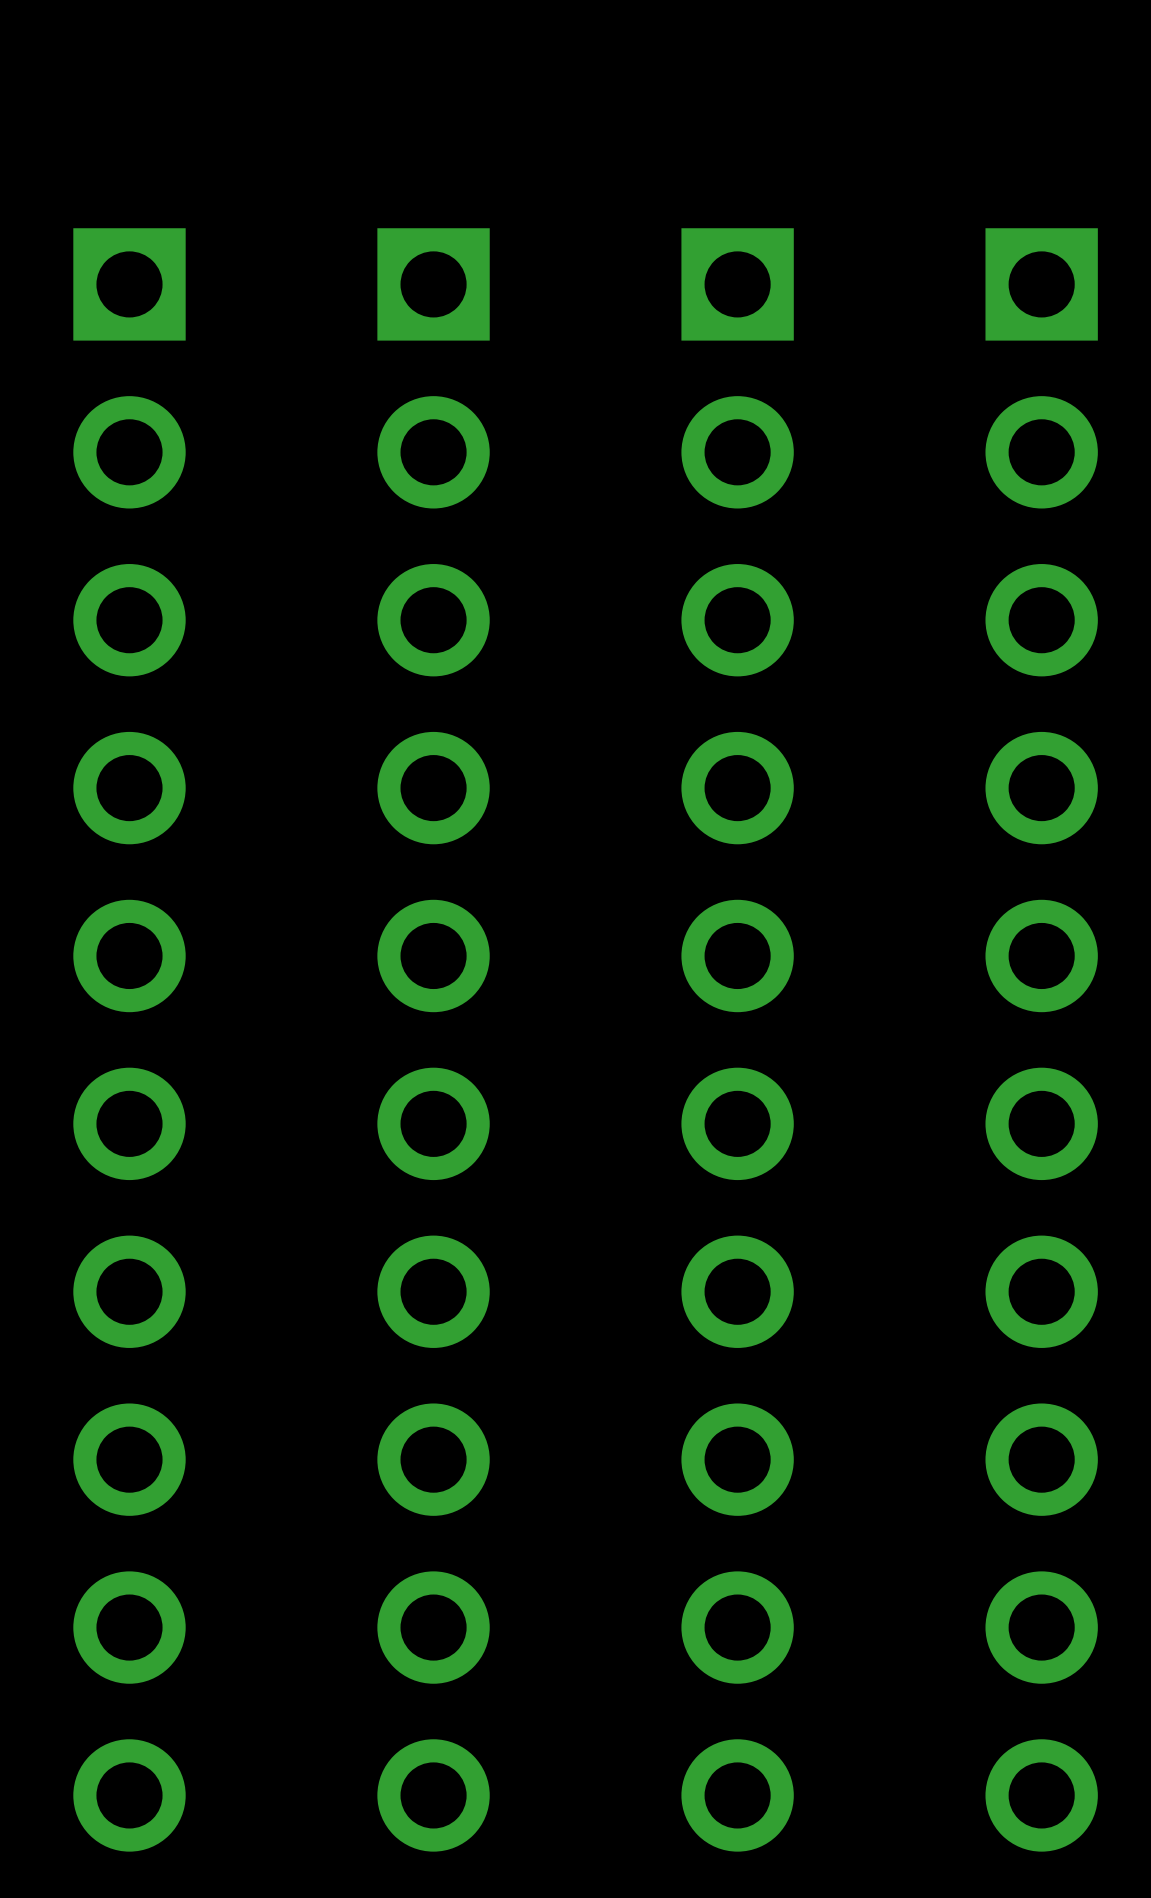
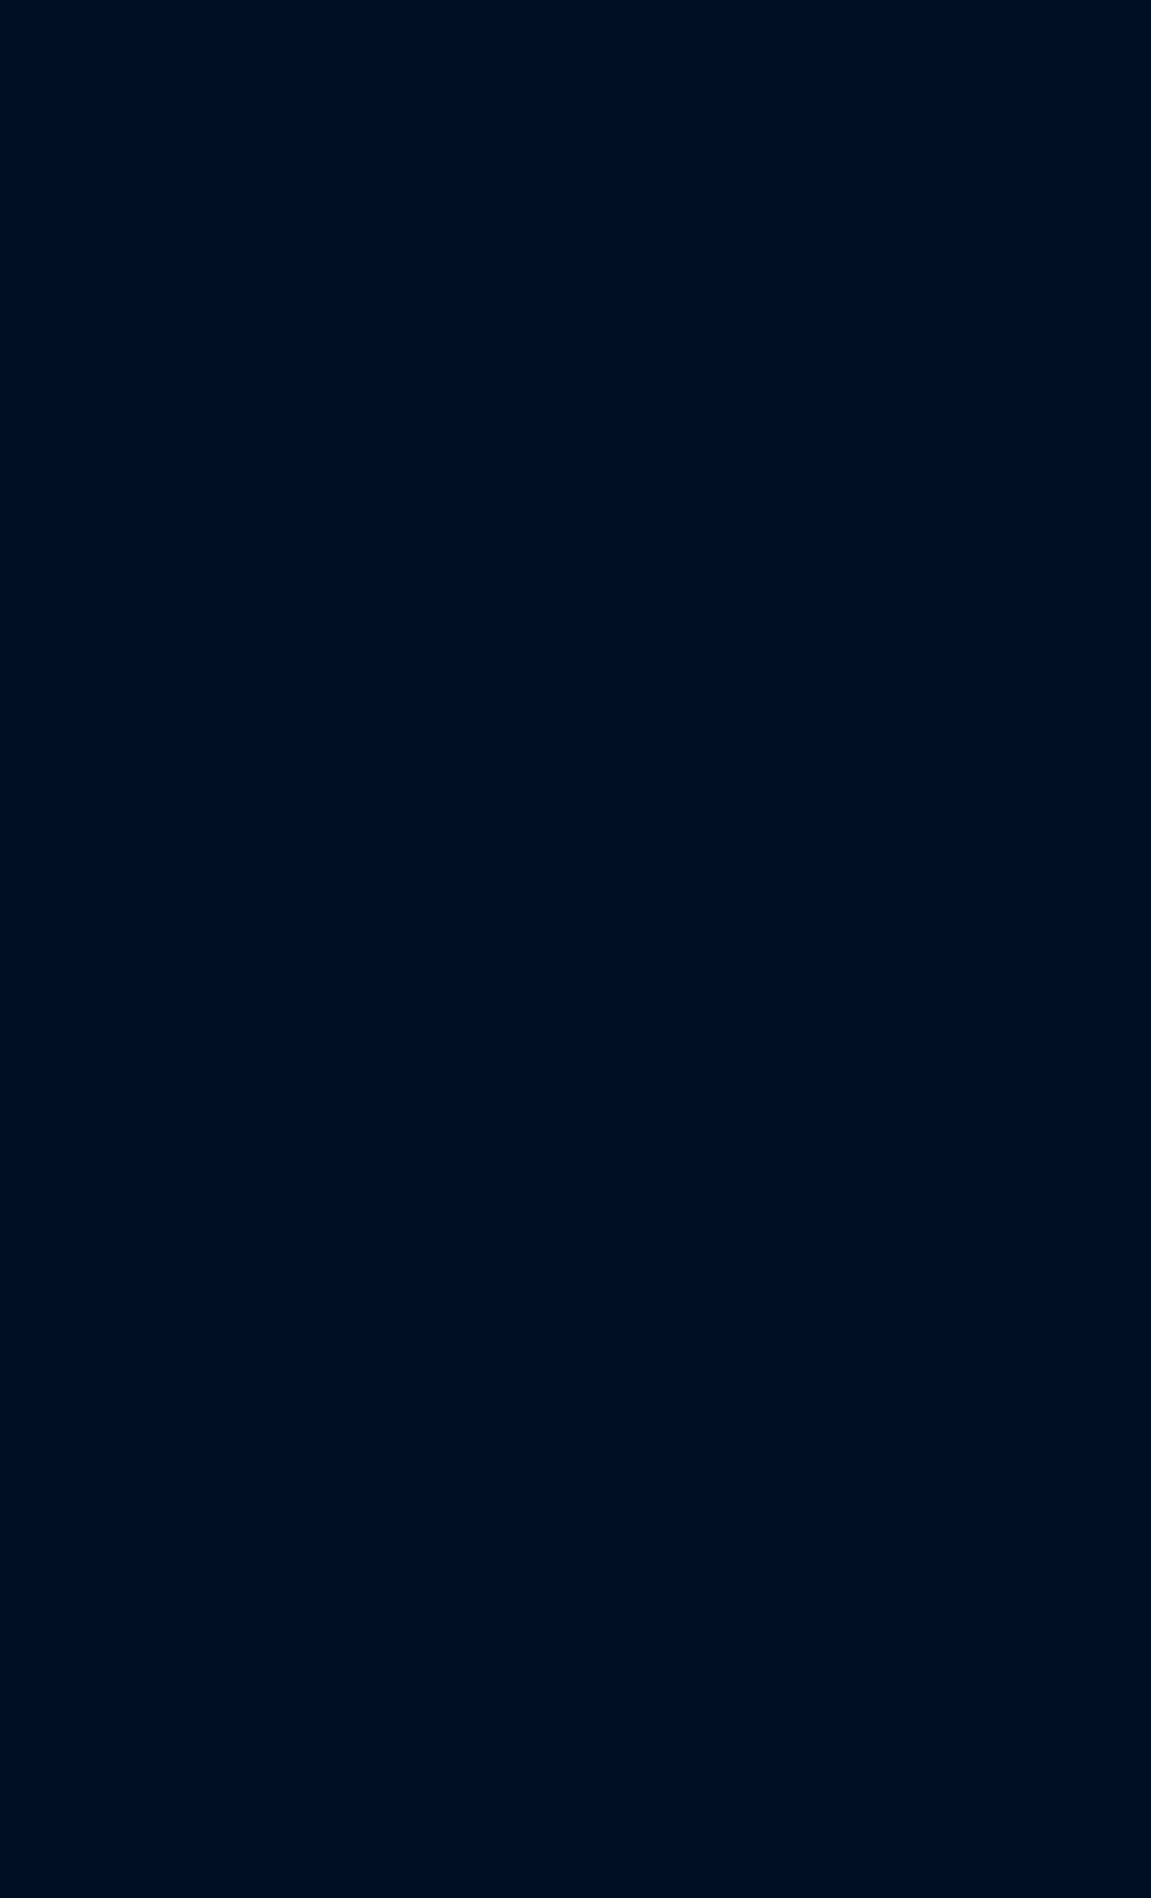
part: (129, 1039) -> none
part: (433, 1039) -> none
part: (737, 1039) -> none
part: (1041, 1039) -> none

